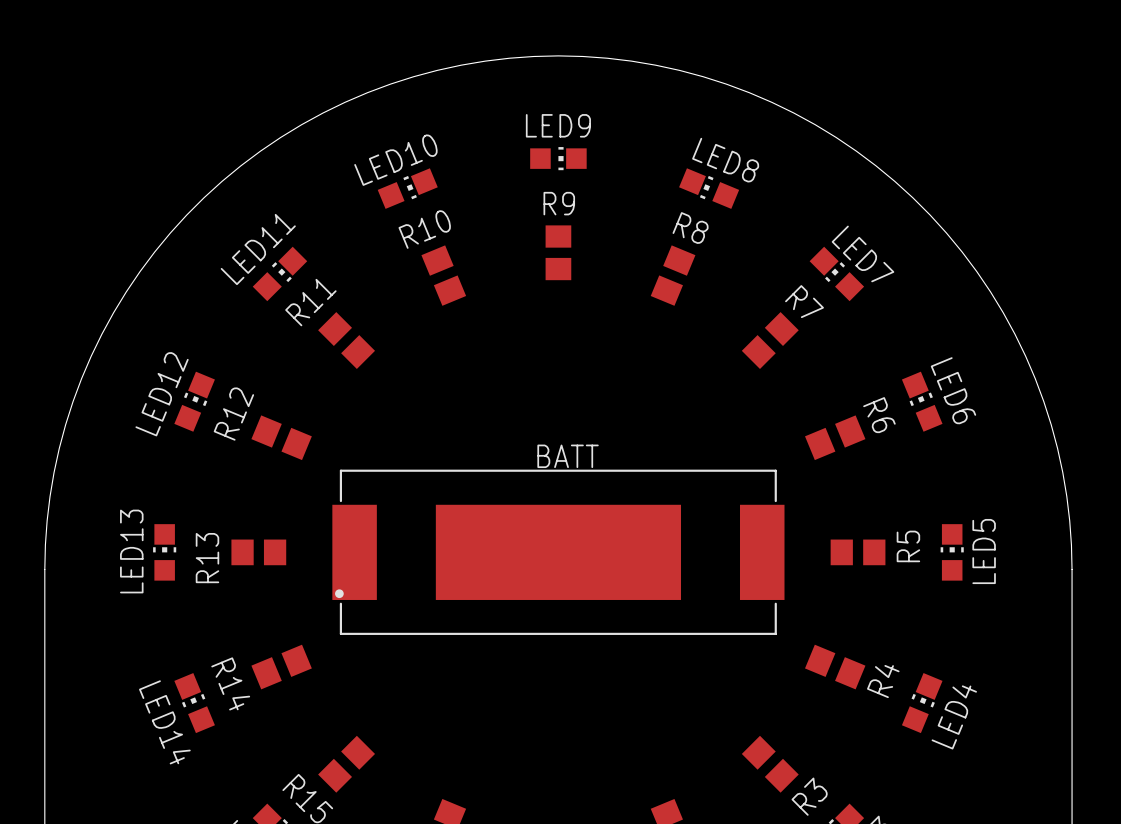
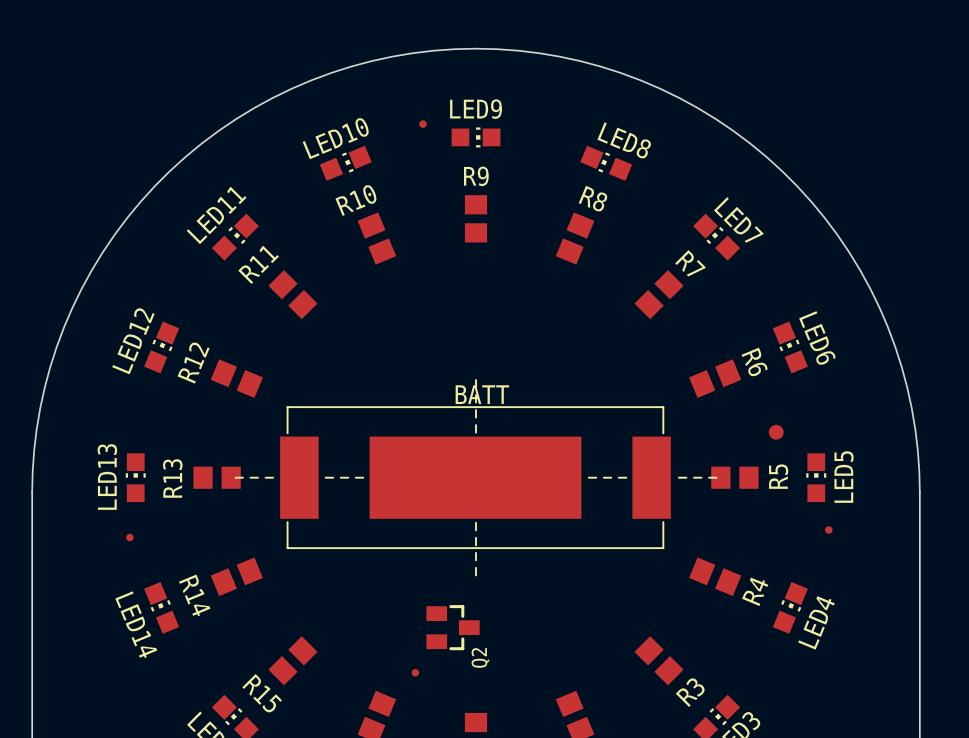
part: none -> (422, 124)
BATT footprint: [332, 469, 785, 635] -> [234, 379, 718, 577]
part: none -> (776, 432)
part: none -> (828, 529)
part: none -> (129, 537)
Q2: none -> (453, 627)
part: none -> (415, 672)

